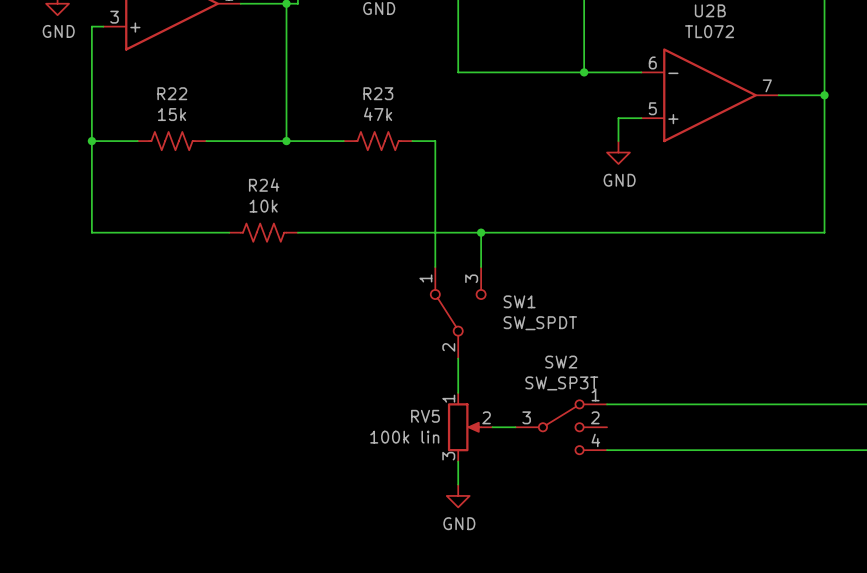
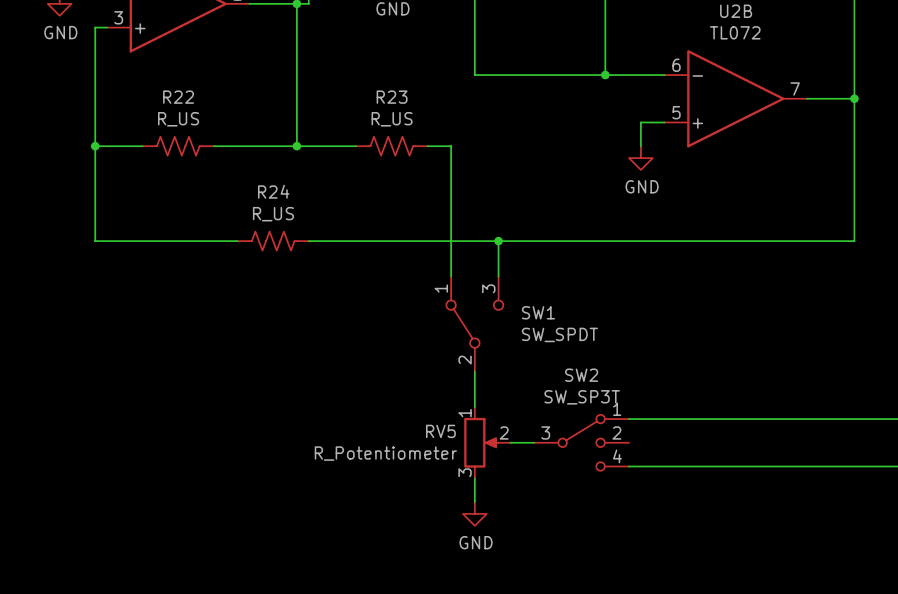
R22 value: 15k (172, 114) -> R_US (178, 119)
R23 value: 47k (378, 114) -> R_US (392, 119)
R24 value: 10k (263, 206) -> R_US (273, 214)
RV5 value: 100k lin (404, 437) -> R_Potentiometer (385, 453)

